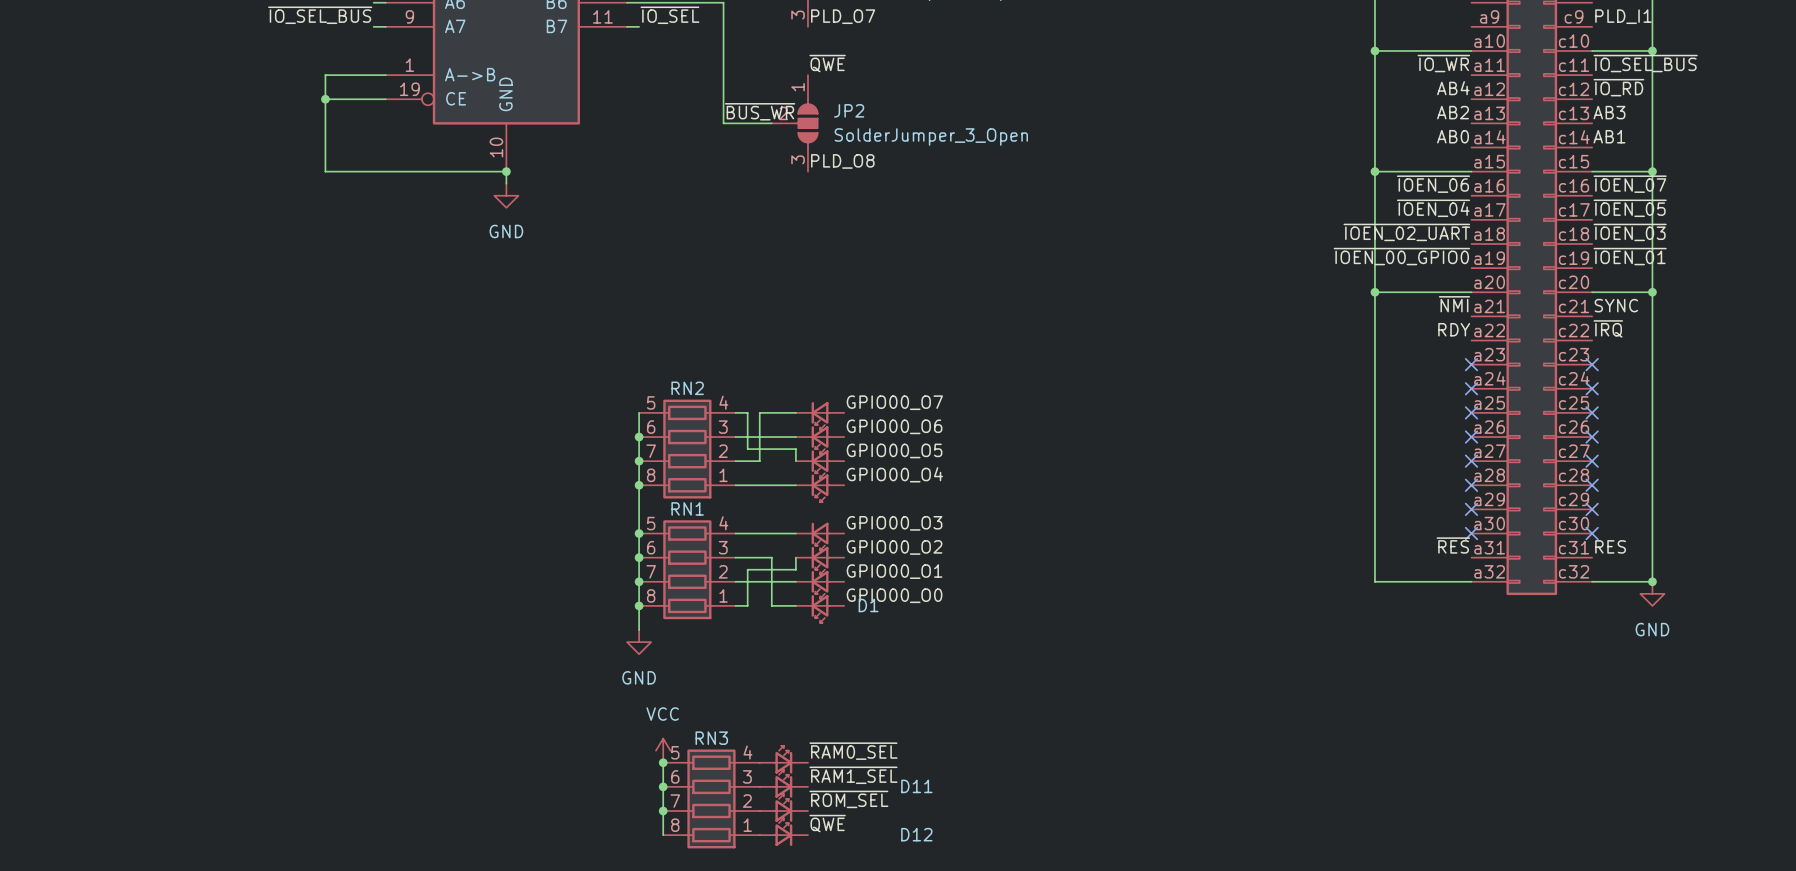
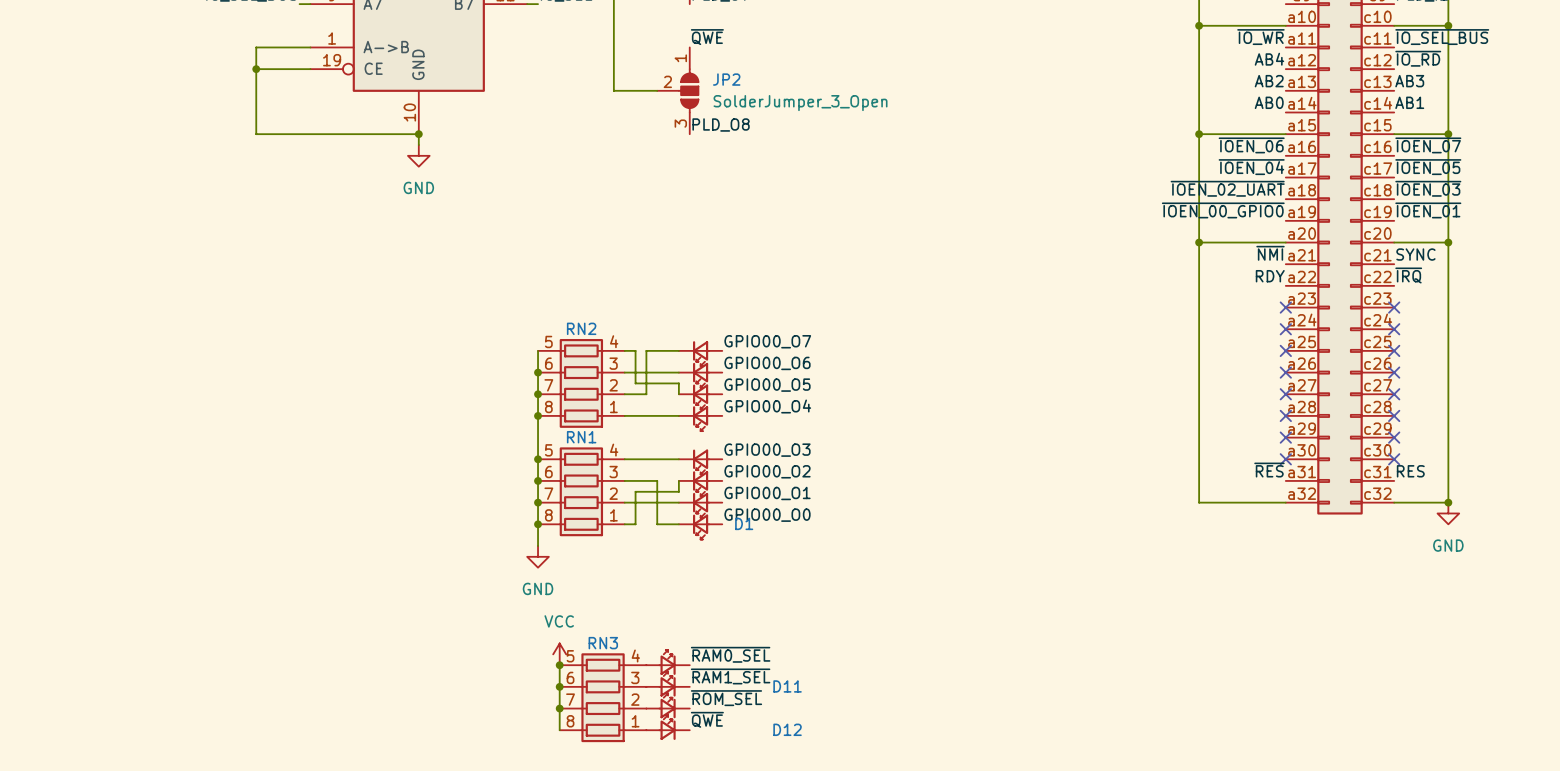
label: ~{BUS_WR} (760, 111) -> none

